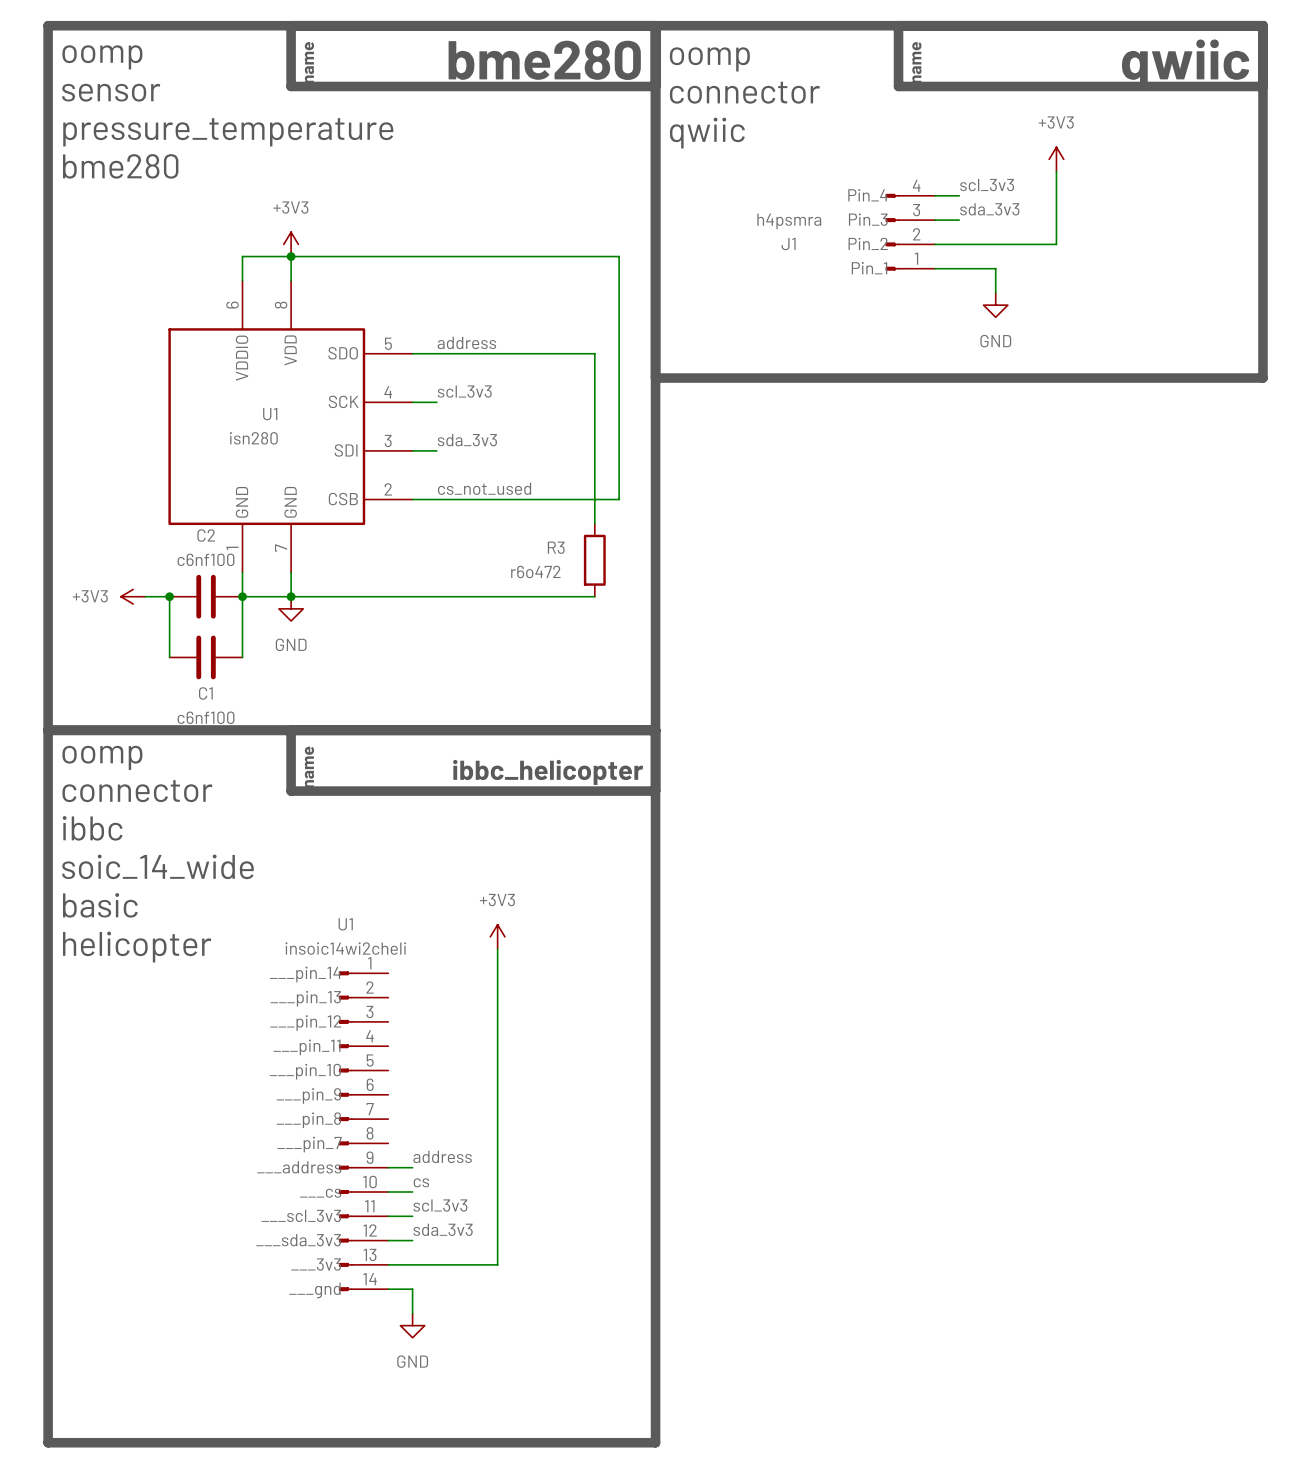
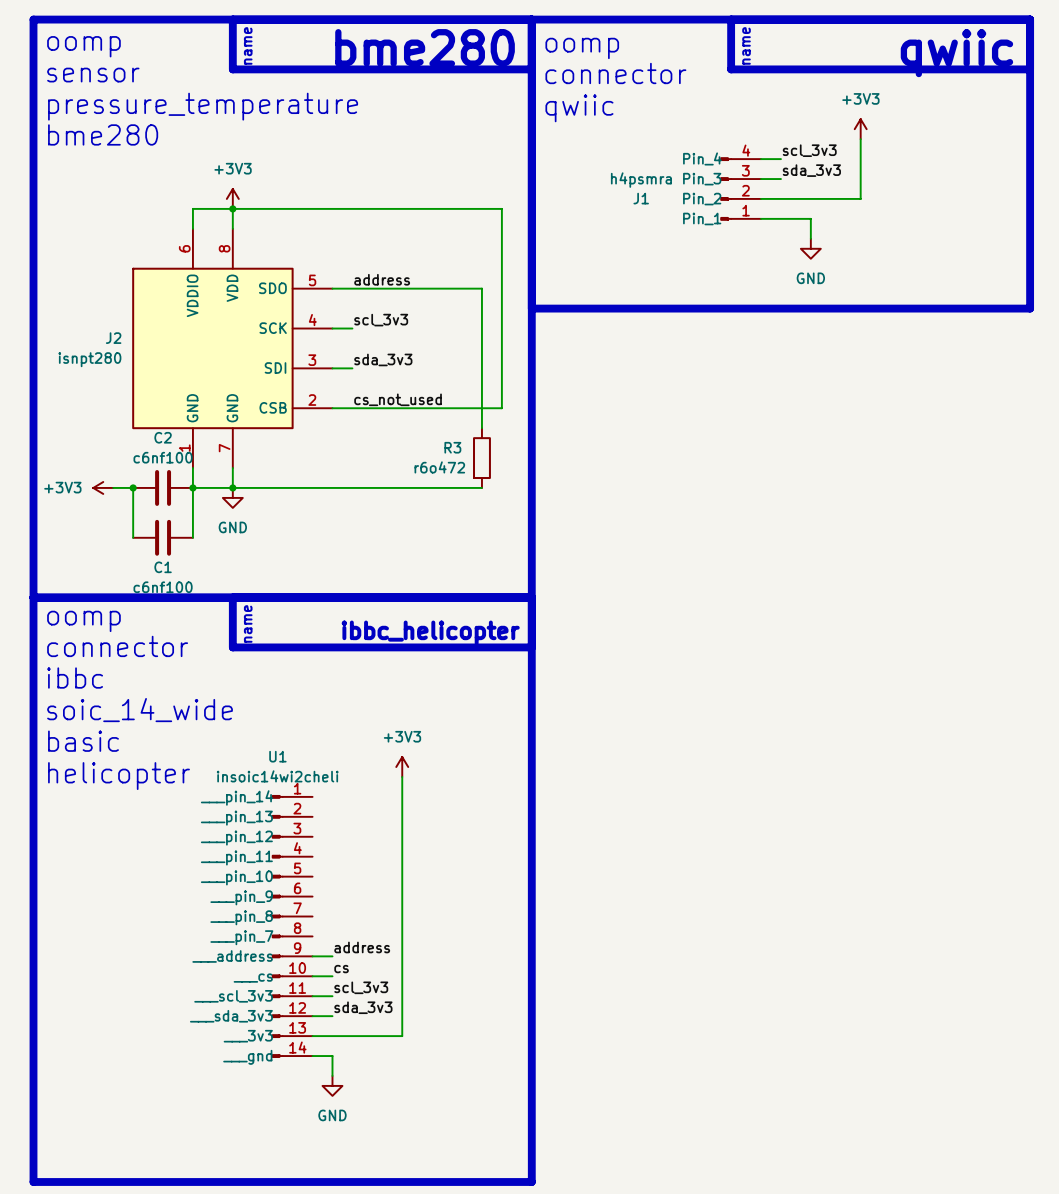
U1 name: U1 (270, 414) -> J2 (113, 338)
U1 value: isn280 (253, 438) -> isnpt280 (89, 359)

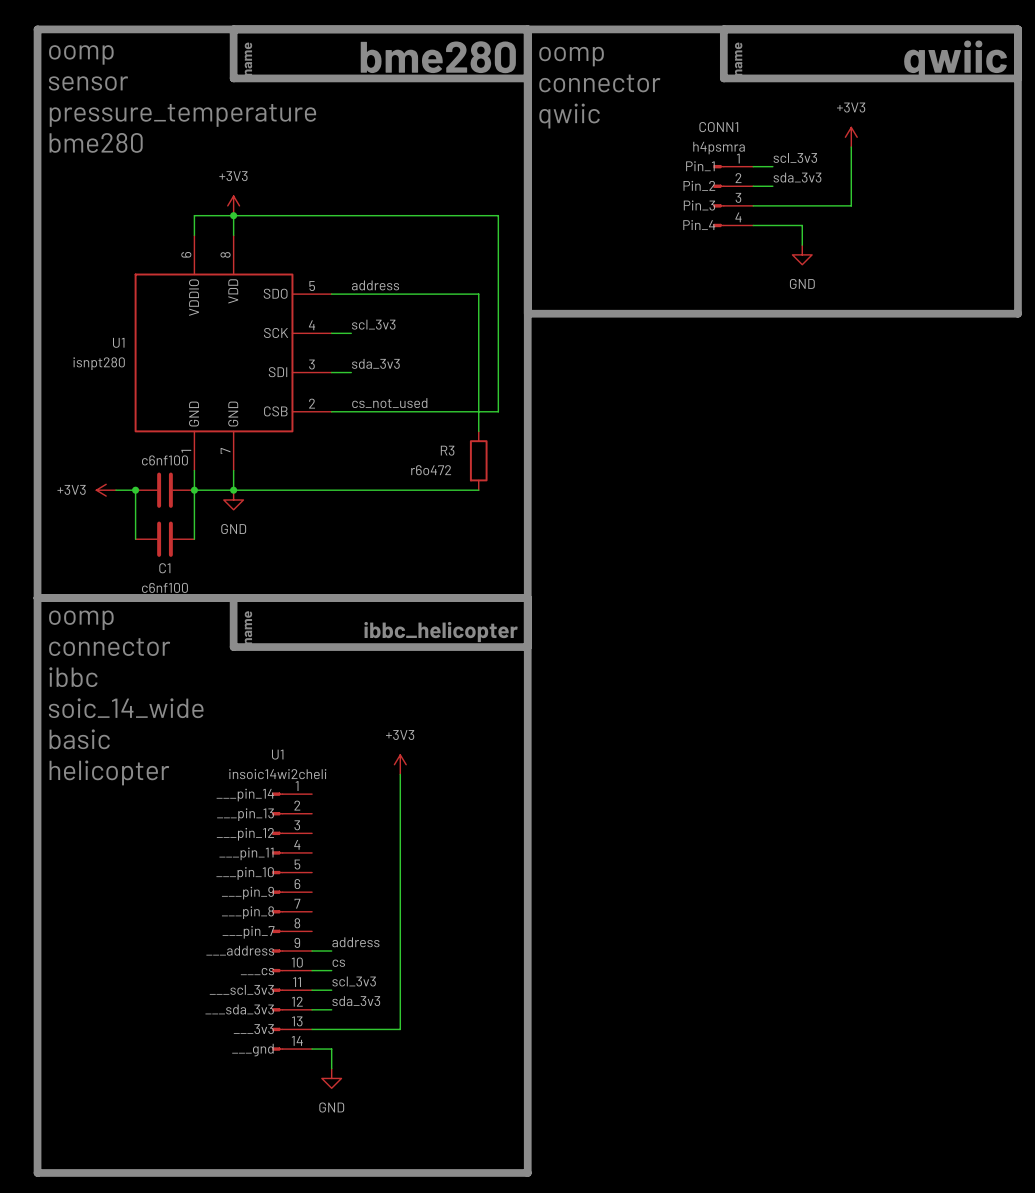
J1 value position: h4psmra (641, 180) -> h4psmra (719, 148)
J1 flip: as is (726, 188) -> up-down (718, 196)
J1 name: J1 (641, 198) -> CONN1 (718, 127)
J2 name: J2 (113, 338) -> U1 (118, 342)
C2 name: C2 (163, 437) -> none

